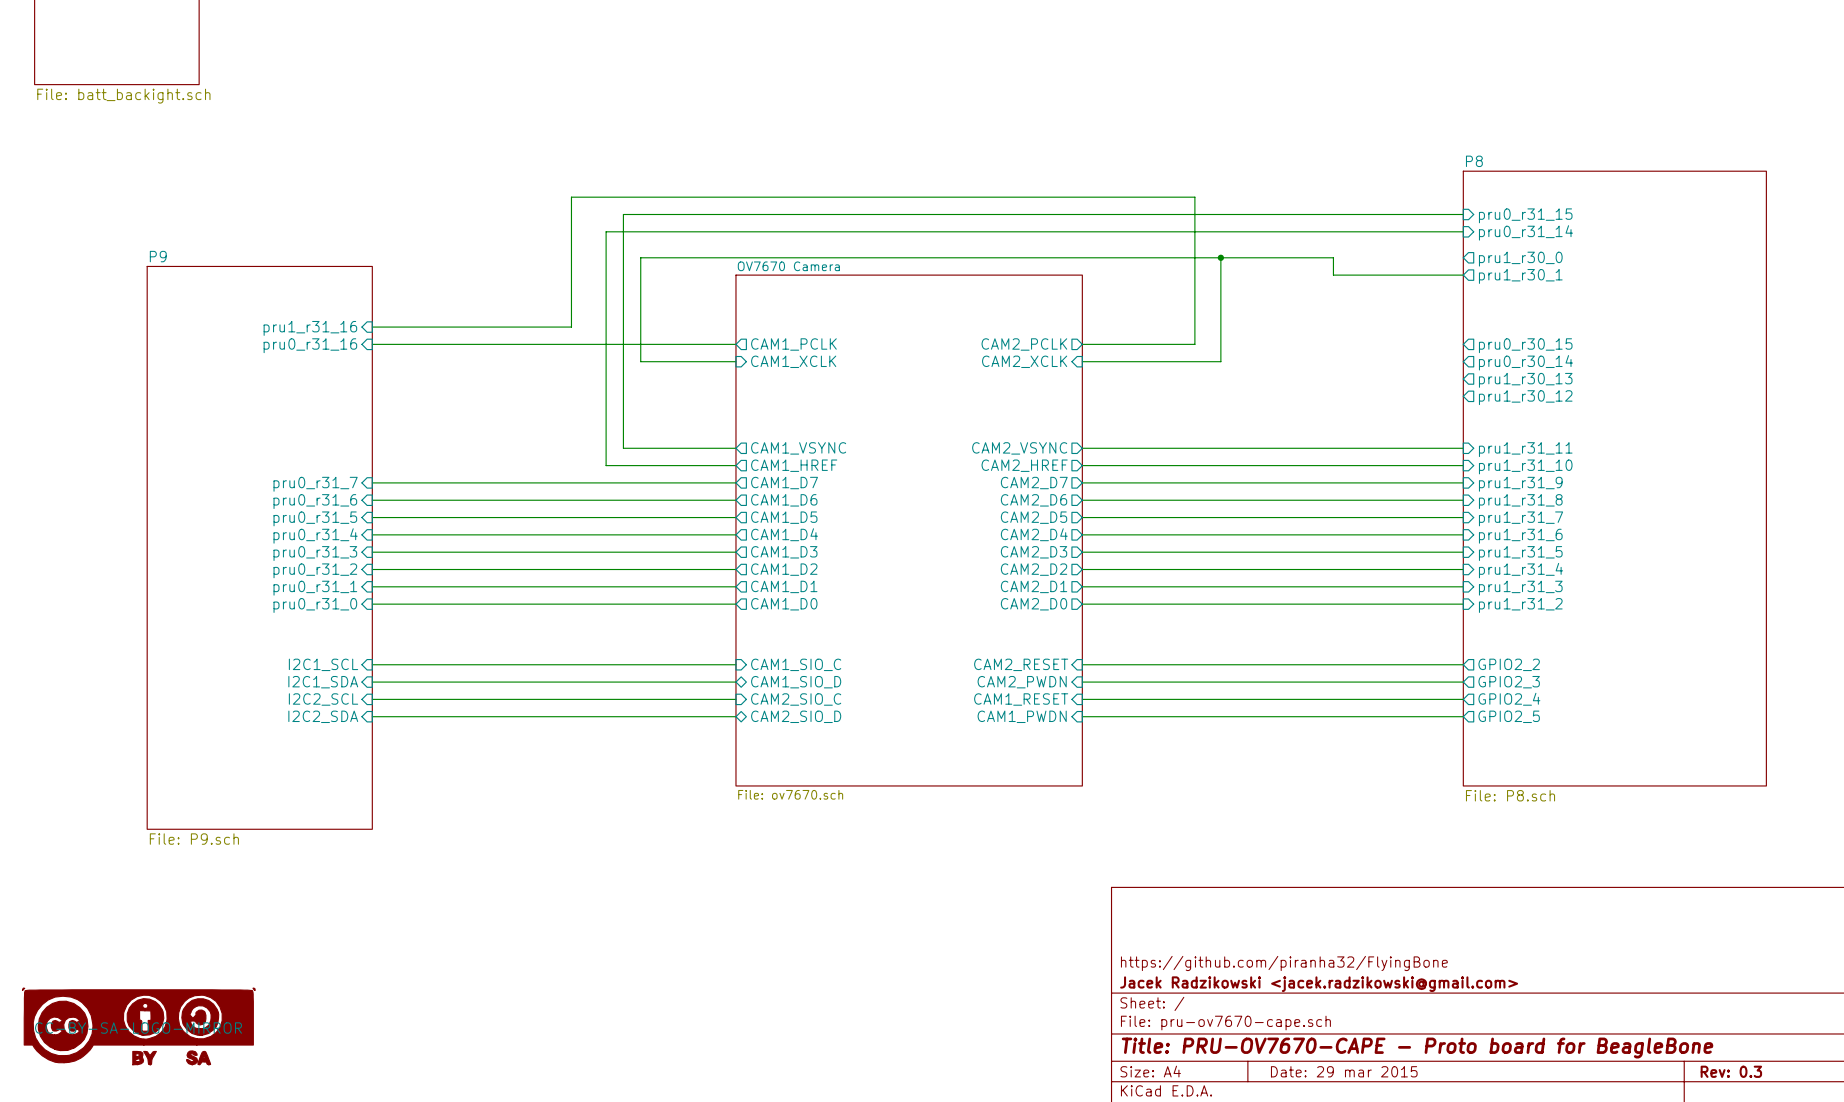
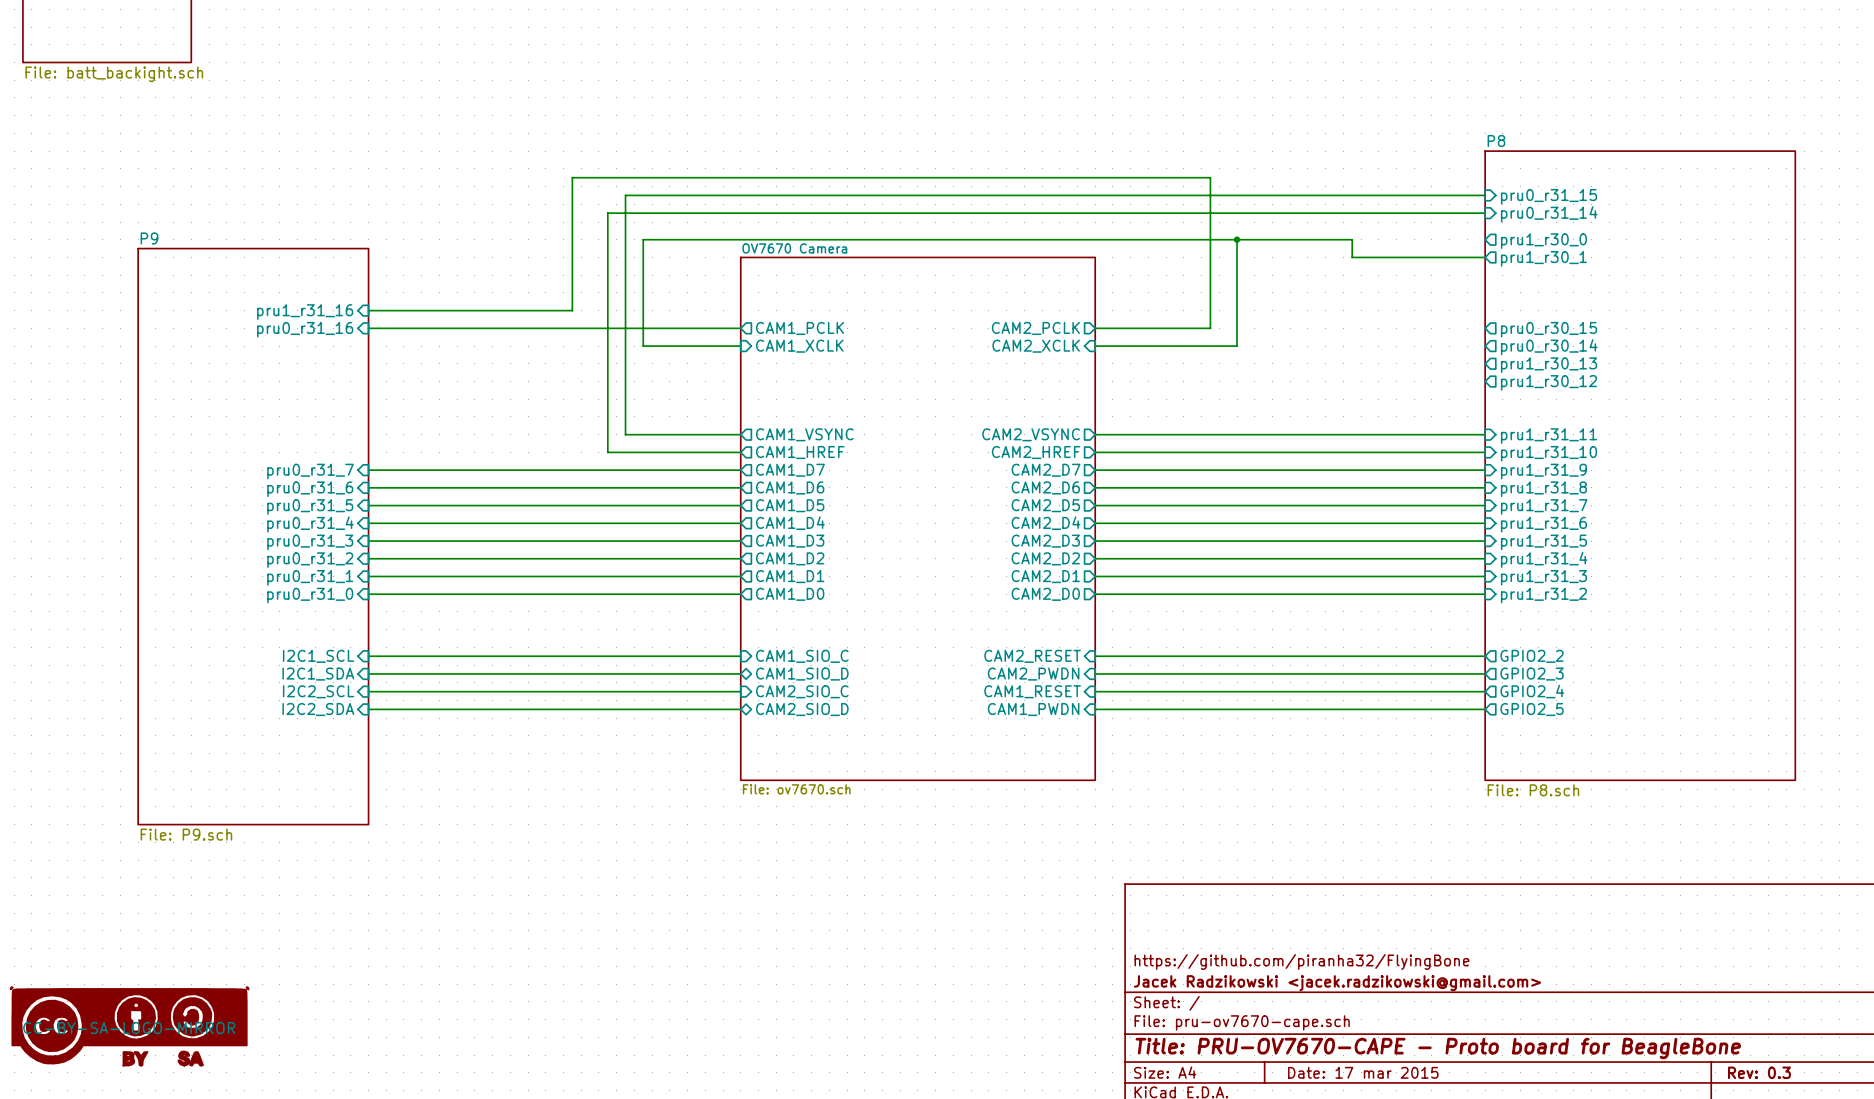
title block: Date: 29 mar 2015 (1344, 1071) -> Date: 17 mar 2015 (1363, 1072)

